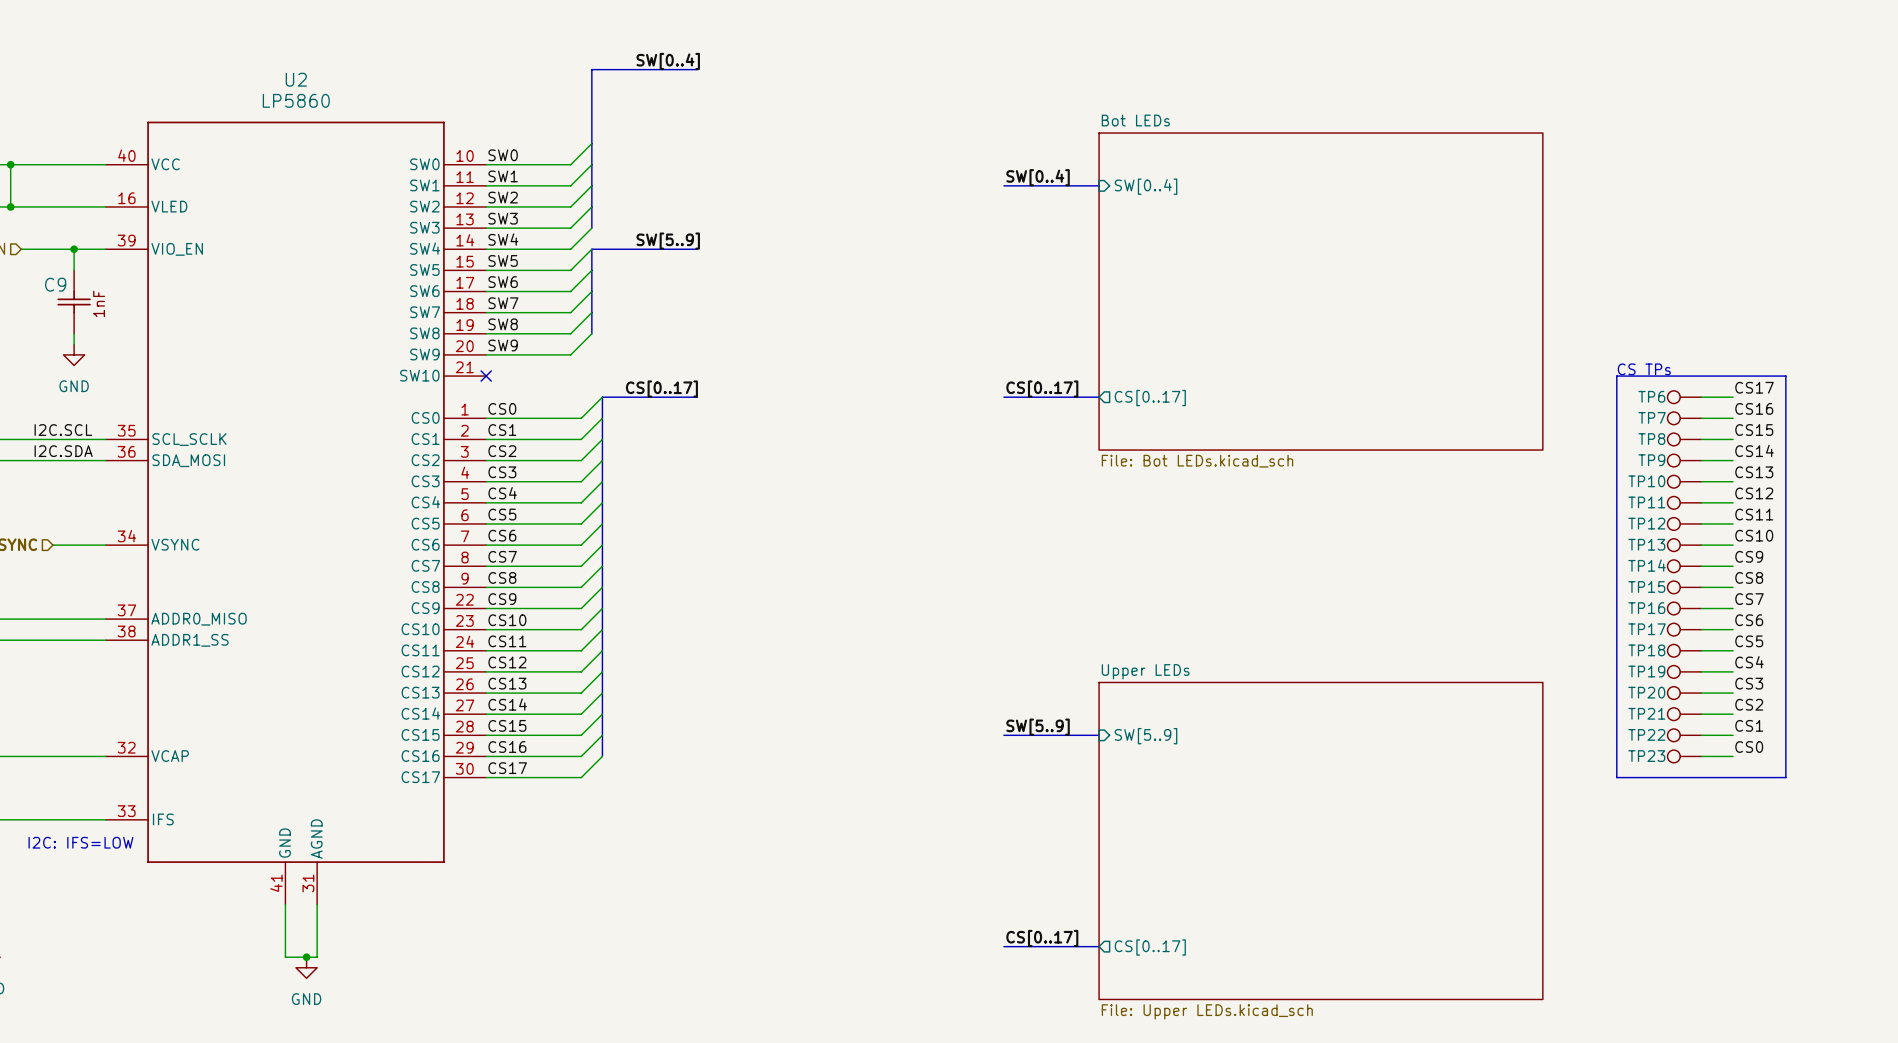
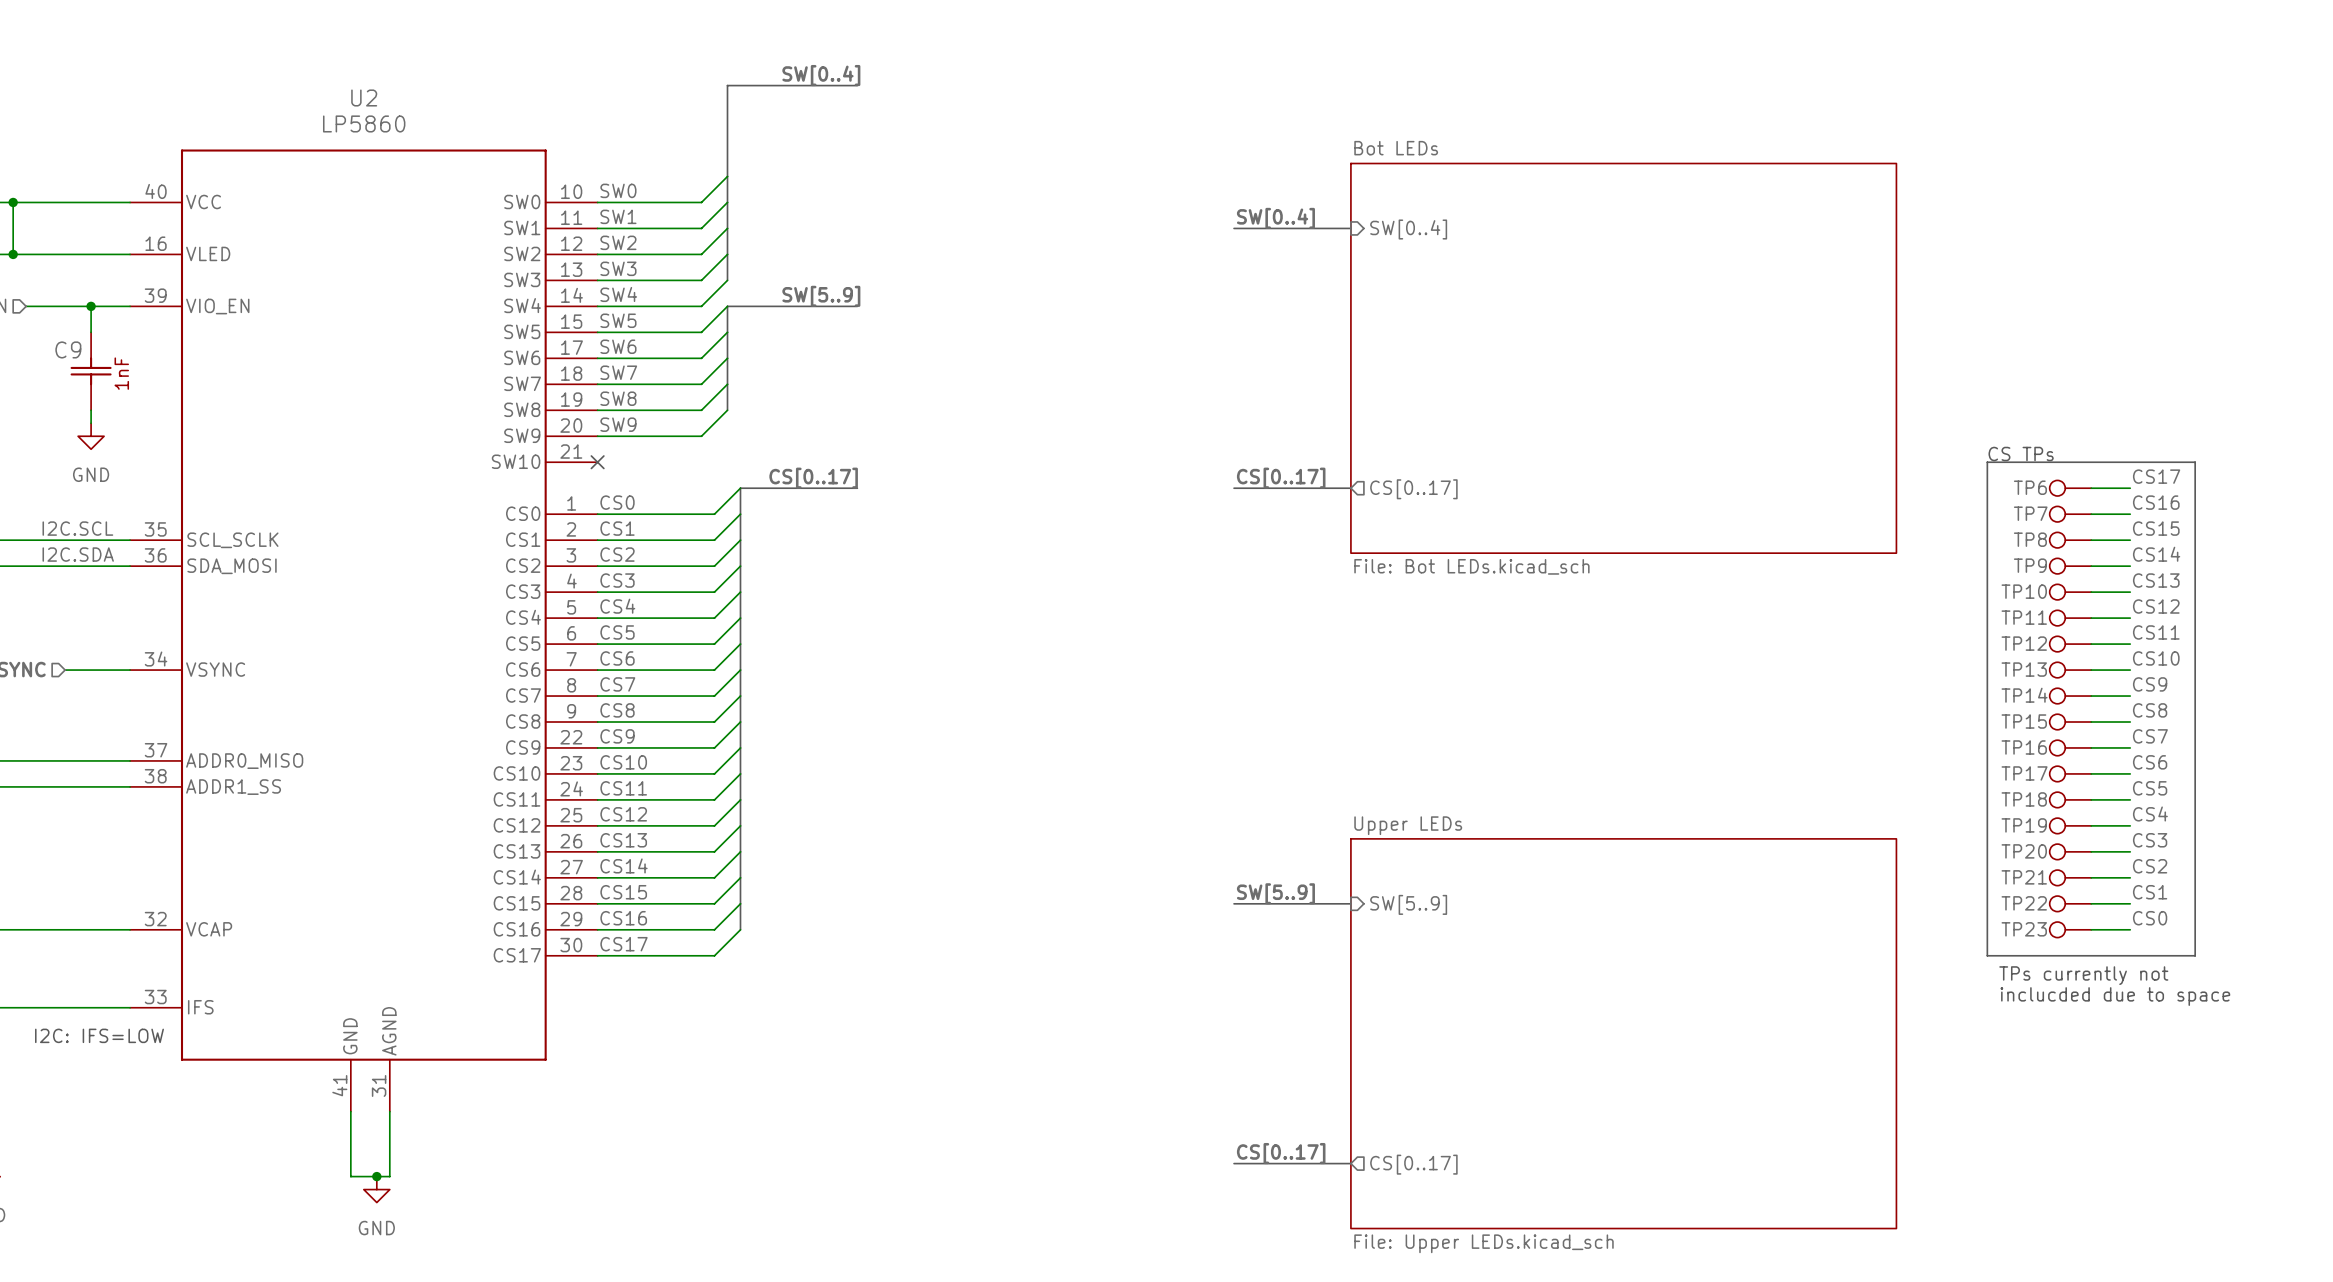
text: none -> TPs currently not (2083, 975)
text: none -> inclucded due to space (2115, 996)

